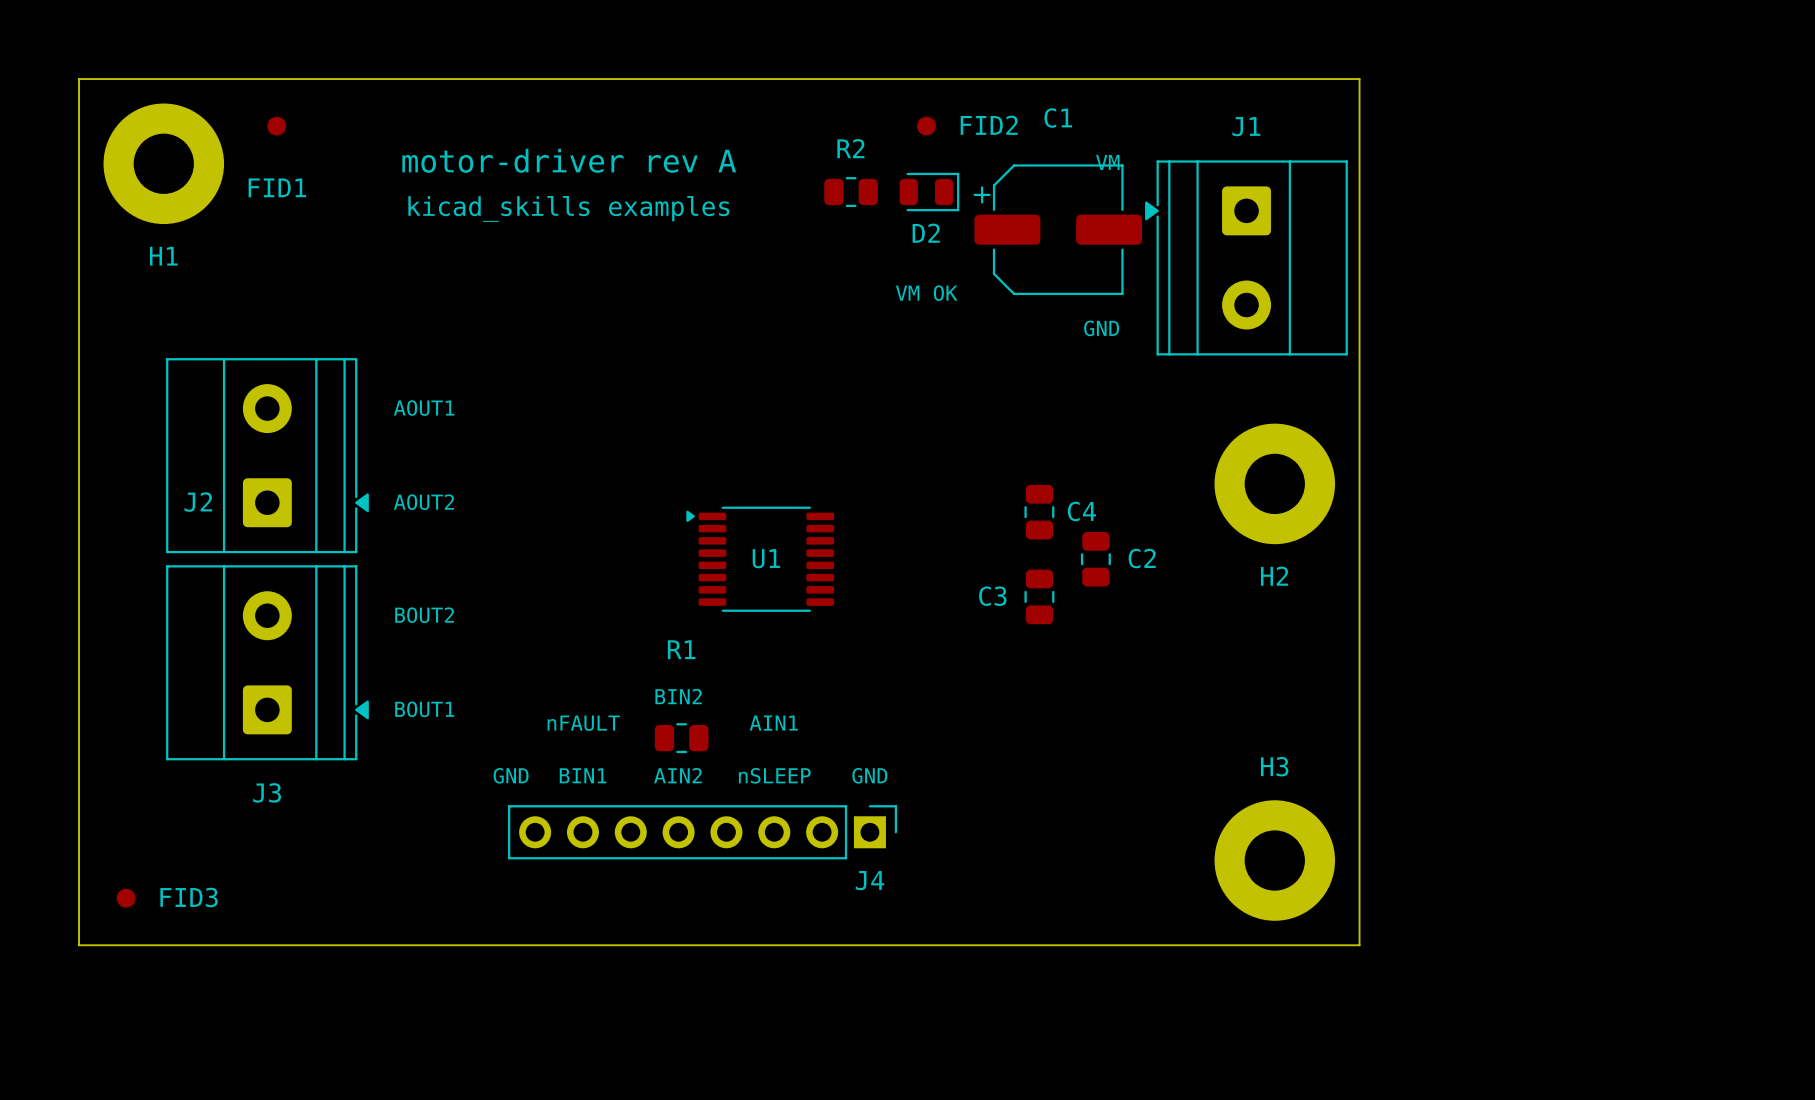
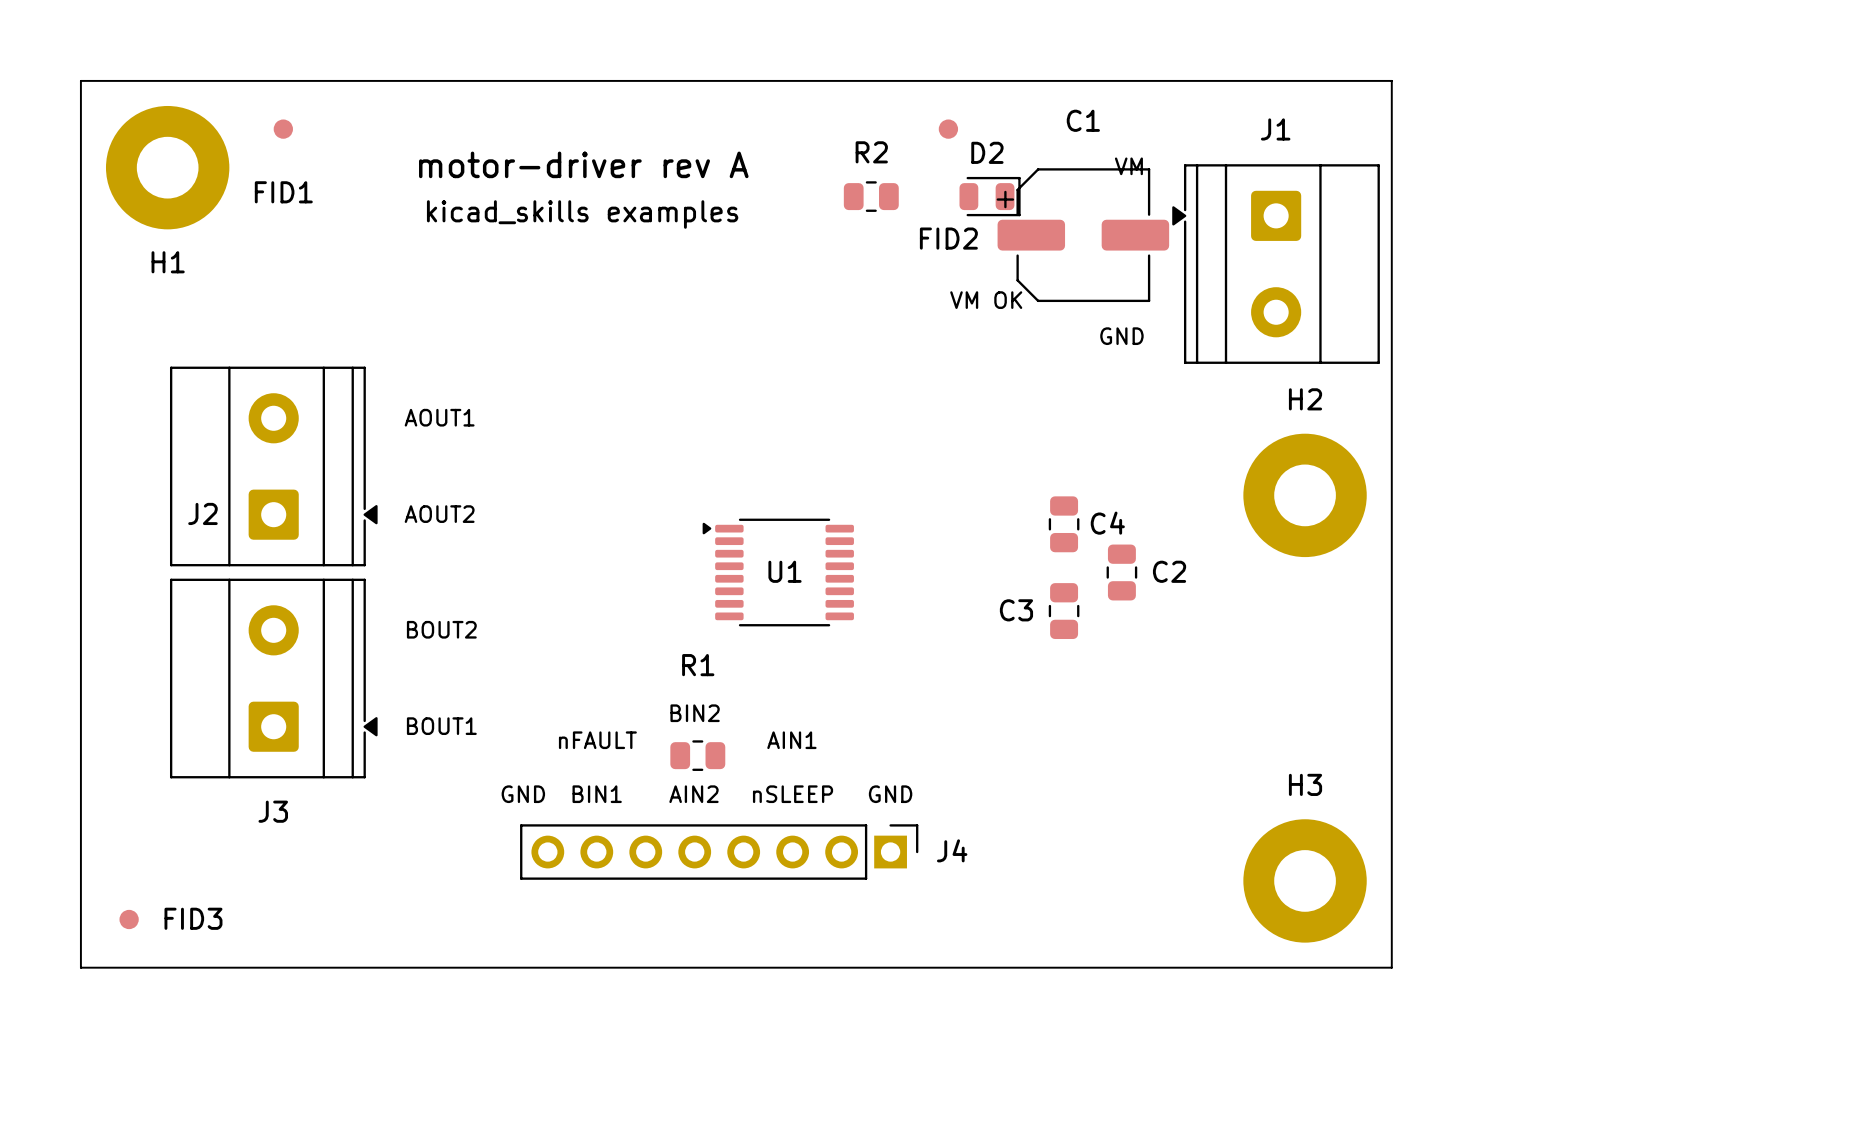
FID2 name position: FID2 (989, 125) -> FID2 (948, 238)
D2 position: (929, 192) -> (990, 196)
D2 name position: D2 (926, 233) -> D2 (987, 152)
text position: VM OK (926, 293) -> VM OK (986, 300)
H2 name position: H2 (1274, 576) -> H2 (1305, 399)
J4 name position: J4 (870, 880) -> J4 (952, 850)

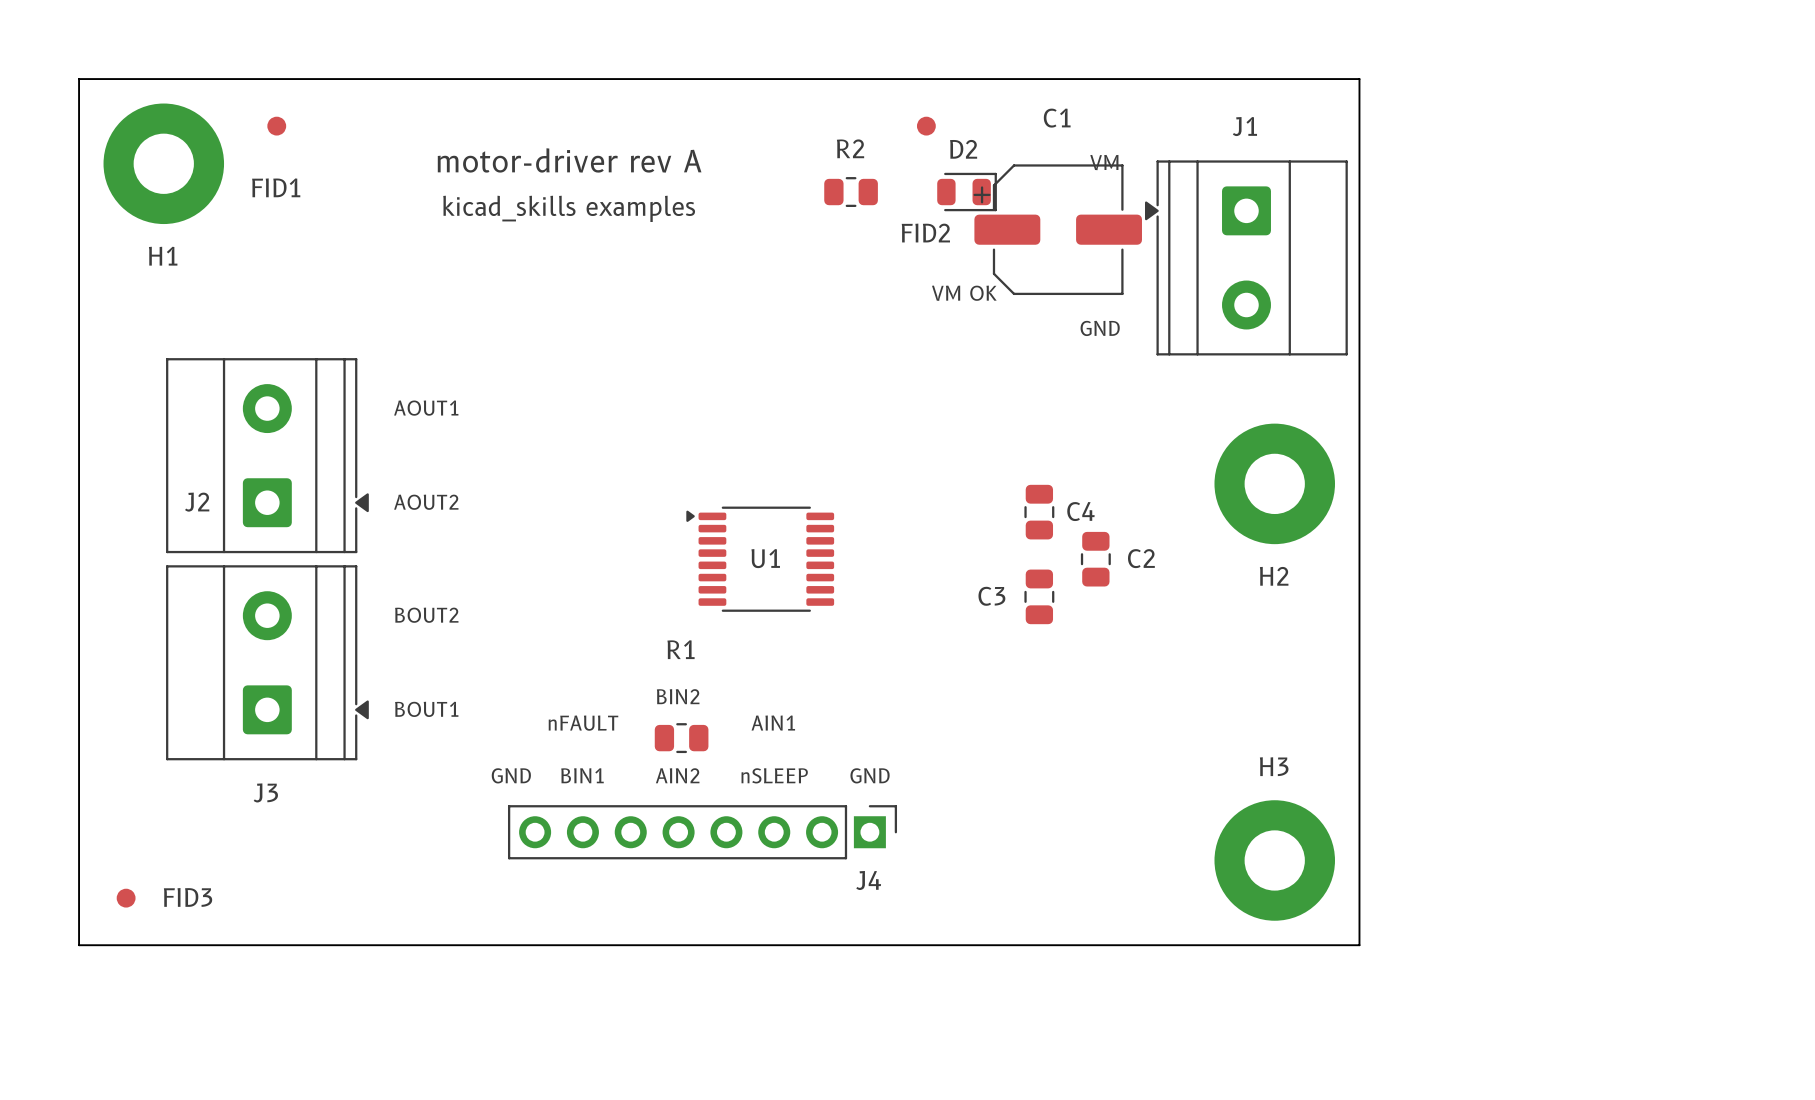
H2 name position: H2 (1305, 399) -> H2 (1274, 576)
J4 name position: J4 (952, 850) -> J4 (868, 880)

